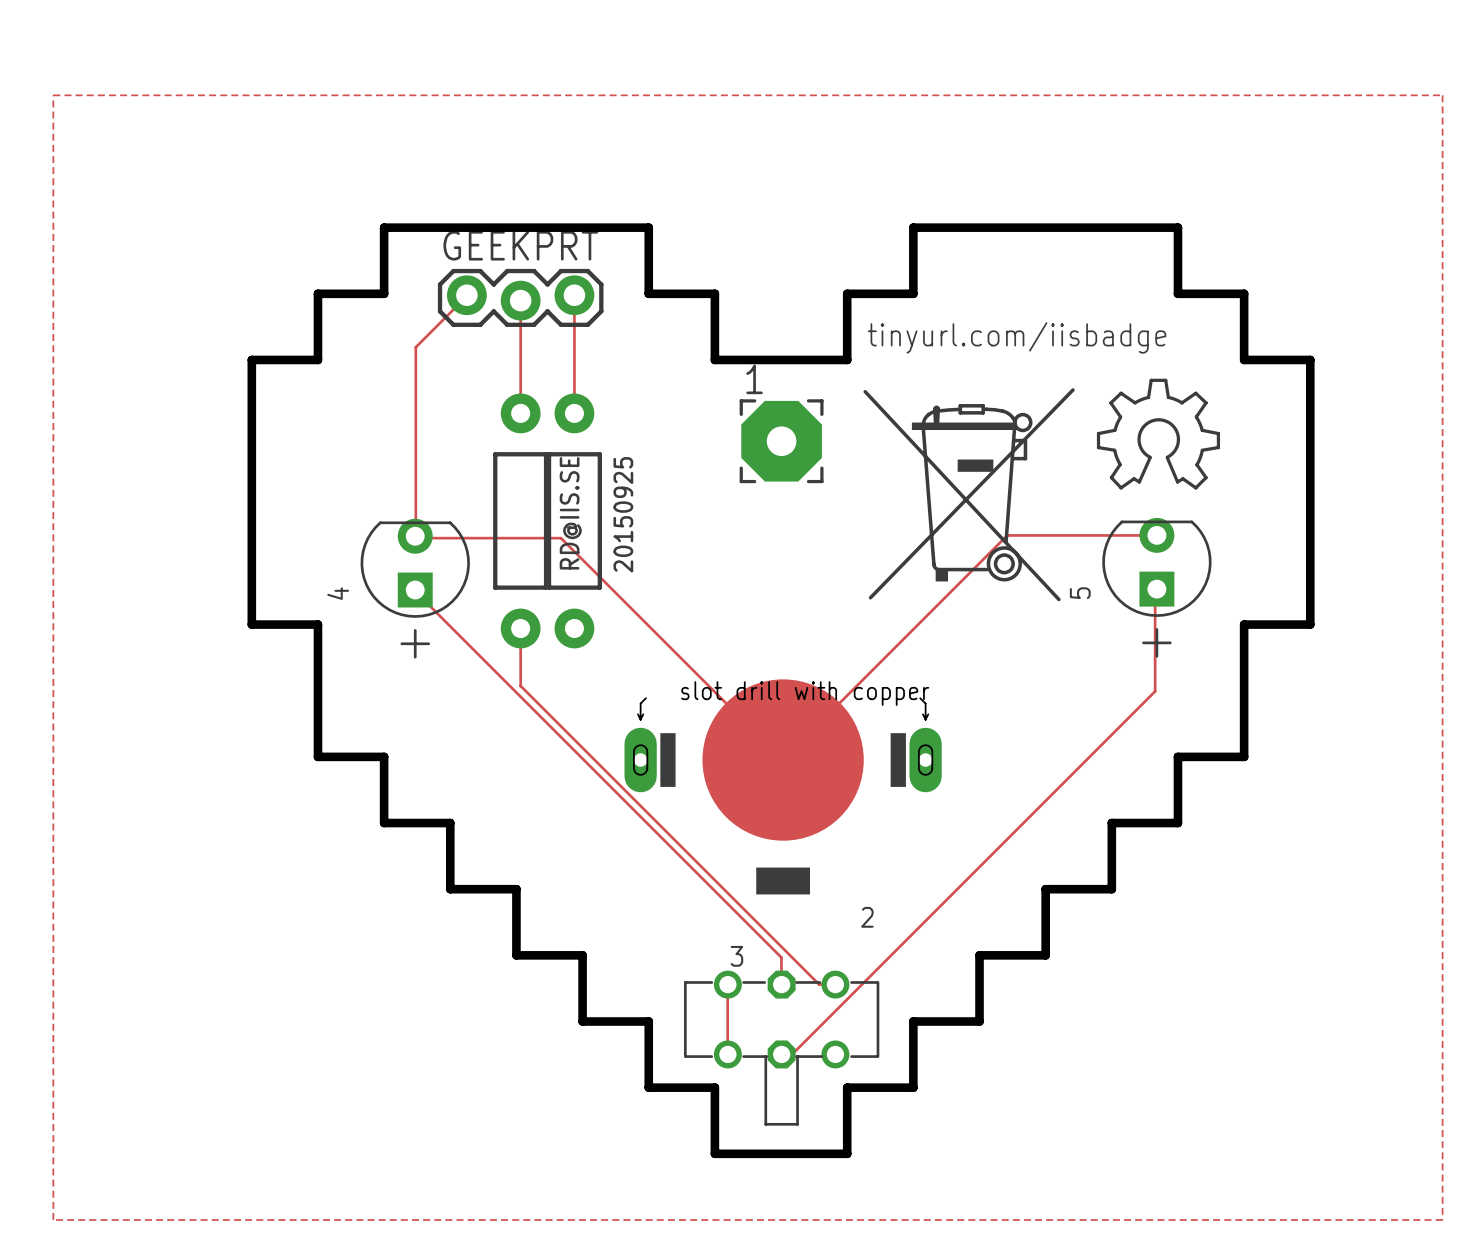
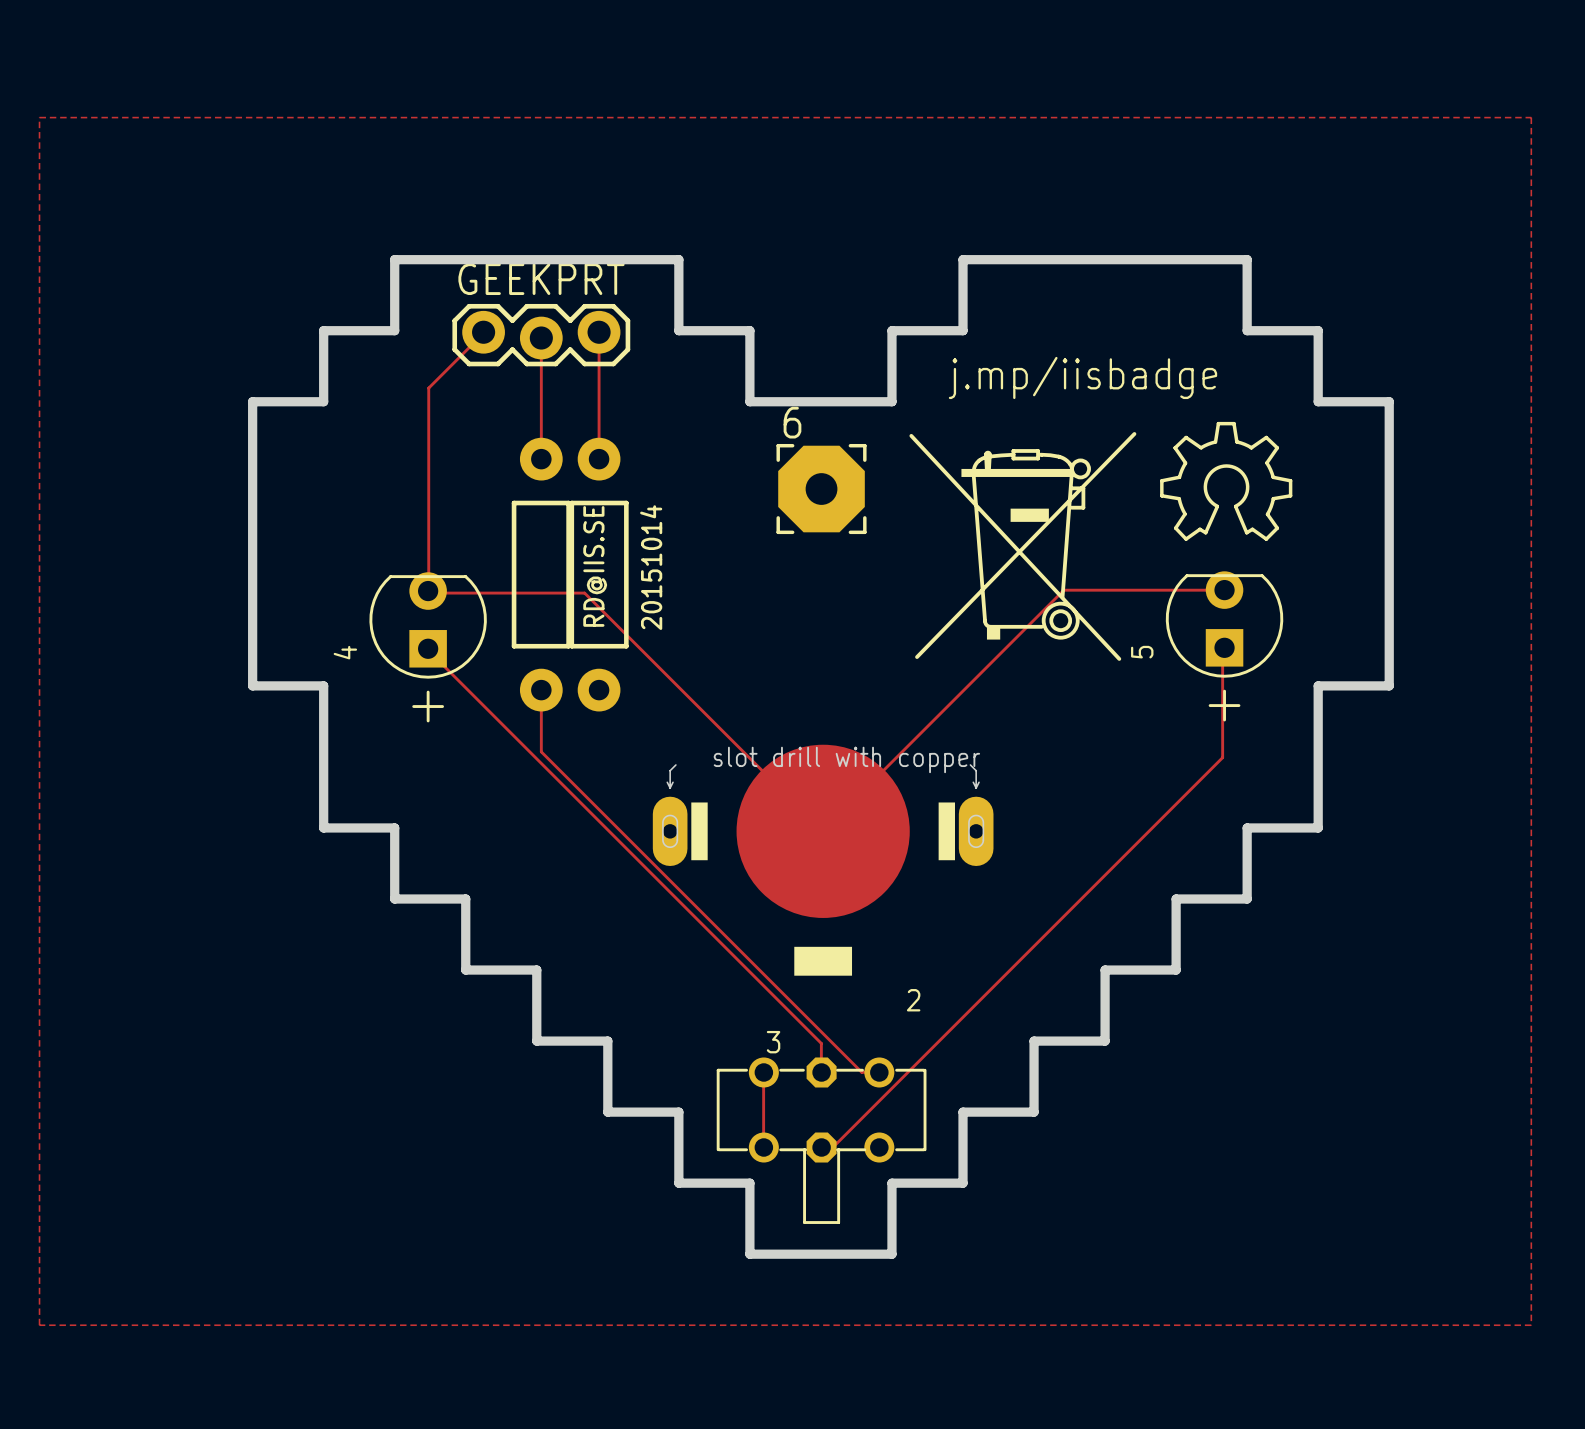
text: tinyurl.com/iisbadge (1017, 337) -> j.mp/iisbadge (1082, 377)
1 name: 1 (754, 379) -> 6 (792, 422)
20150925 name: 20150925 (623, 514) -> 20151014 (651, 567)

